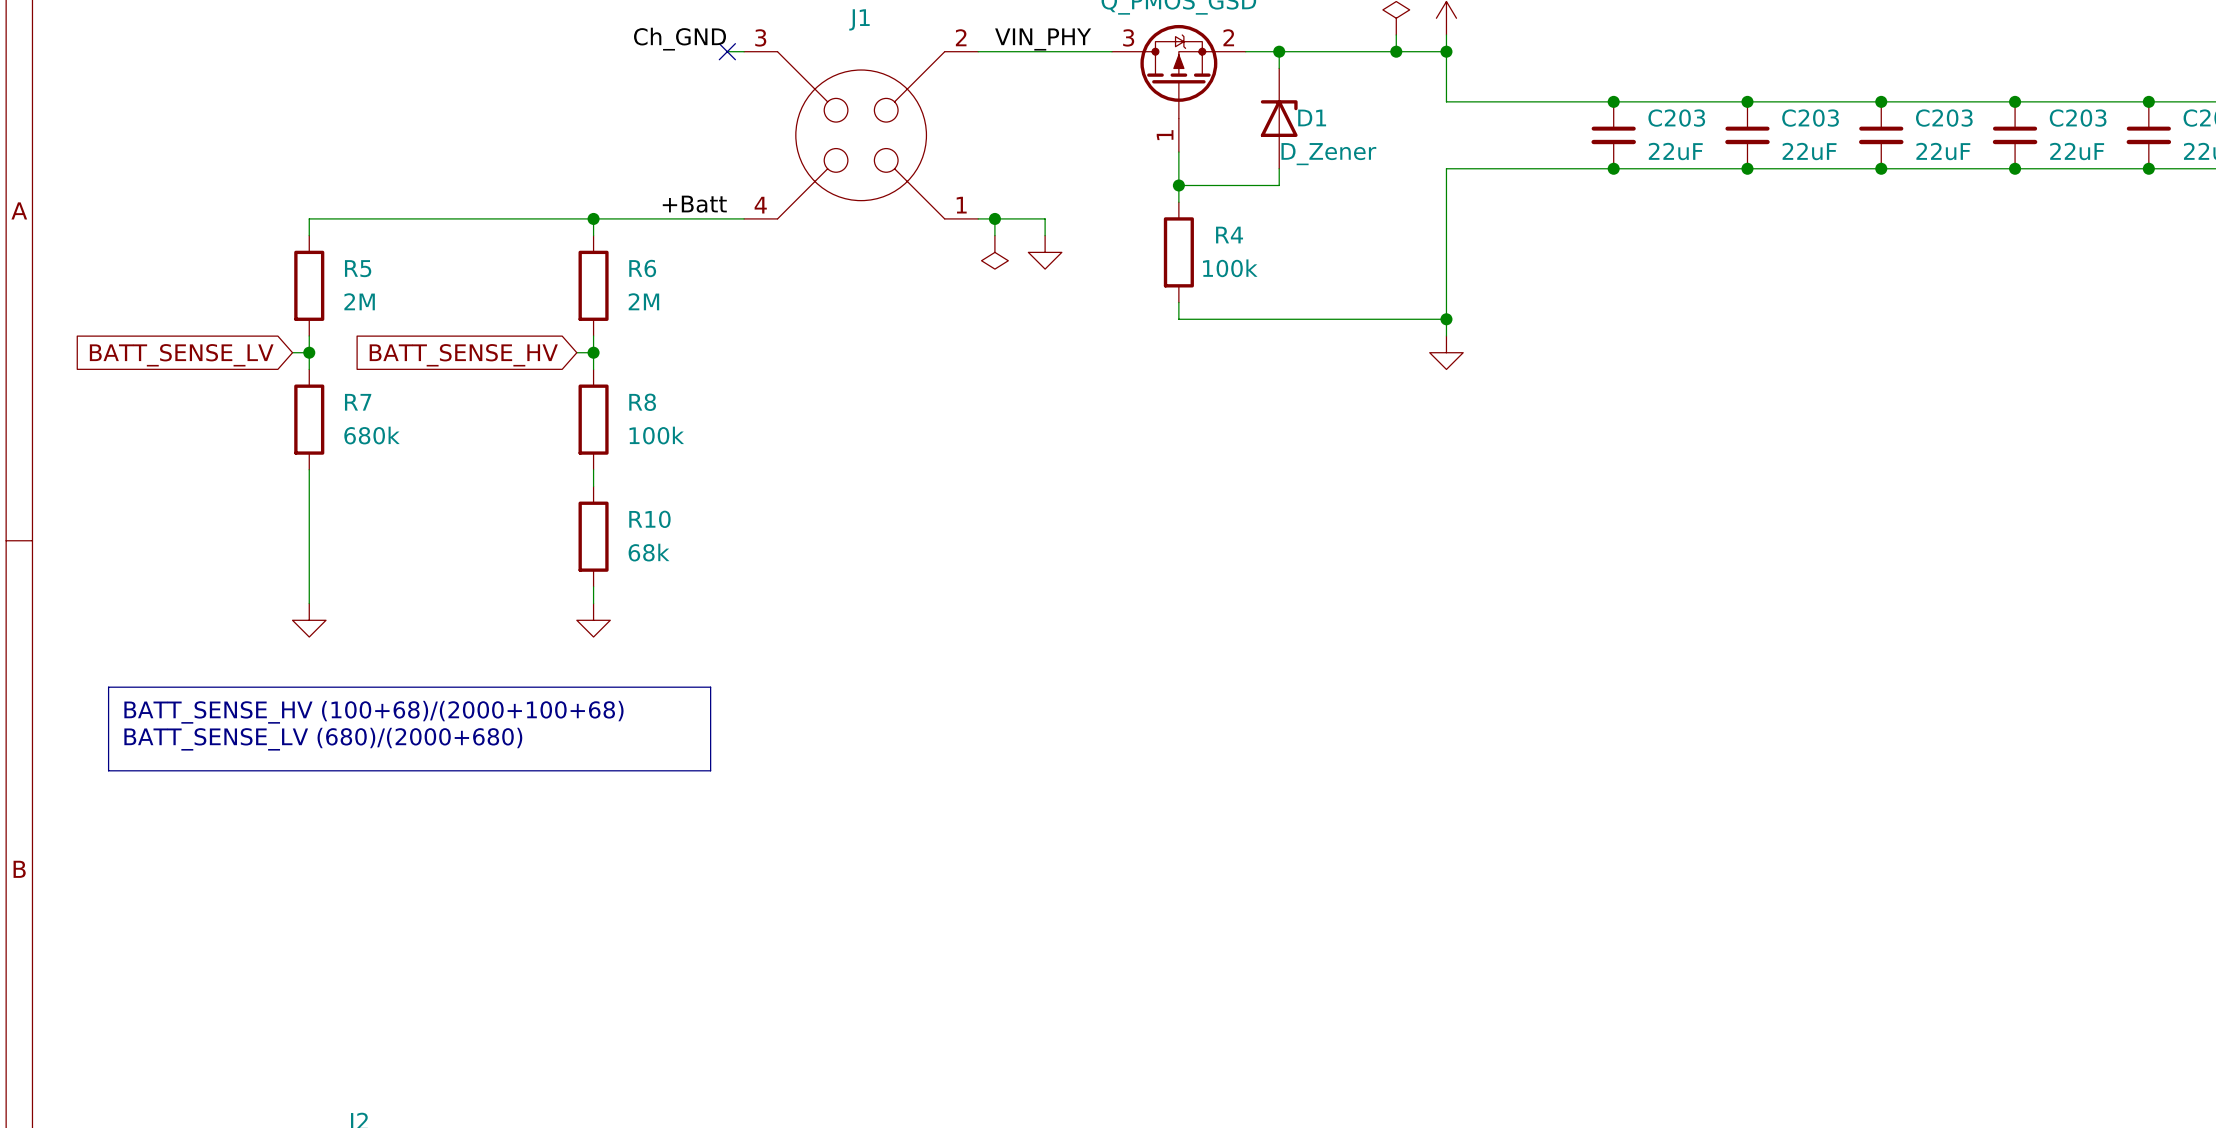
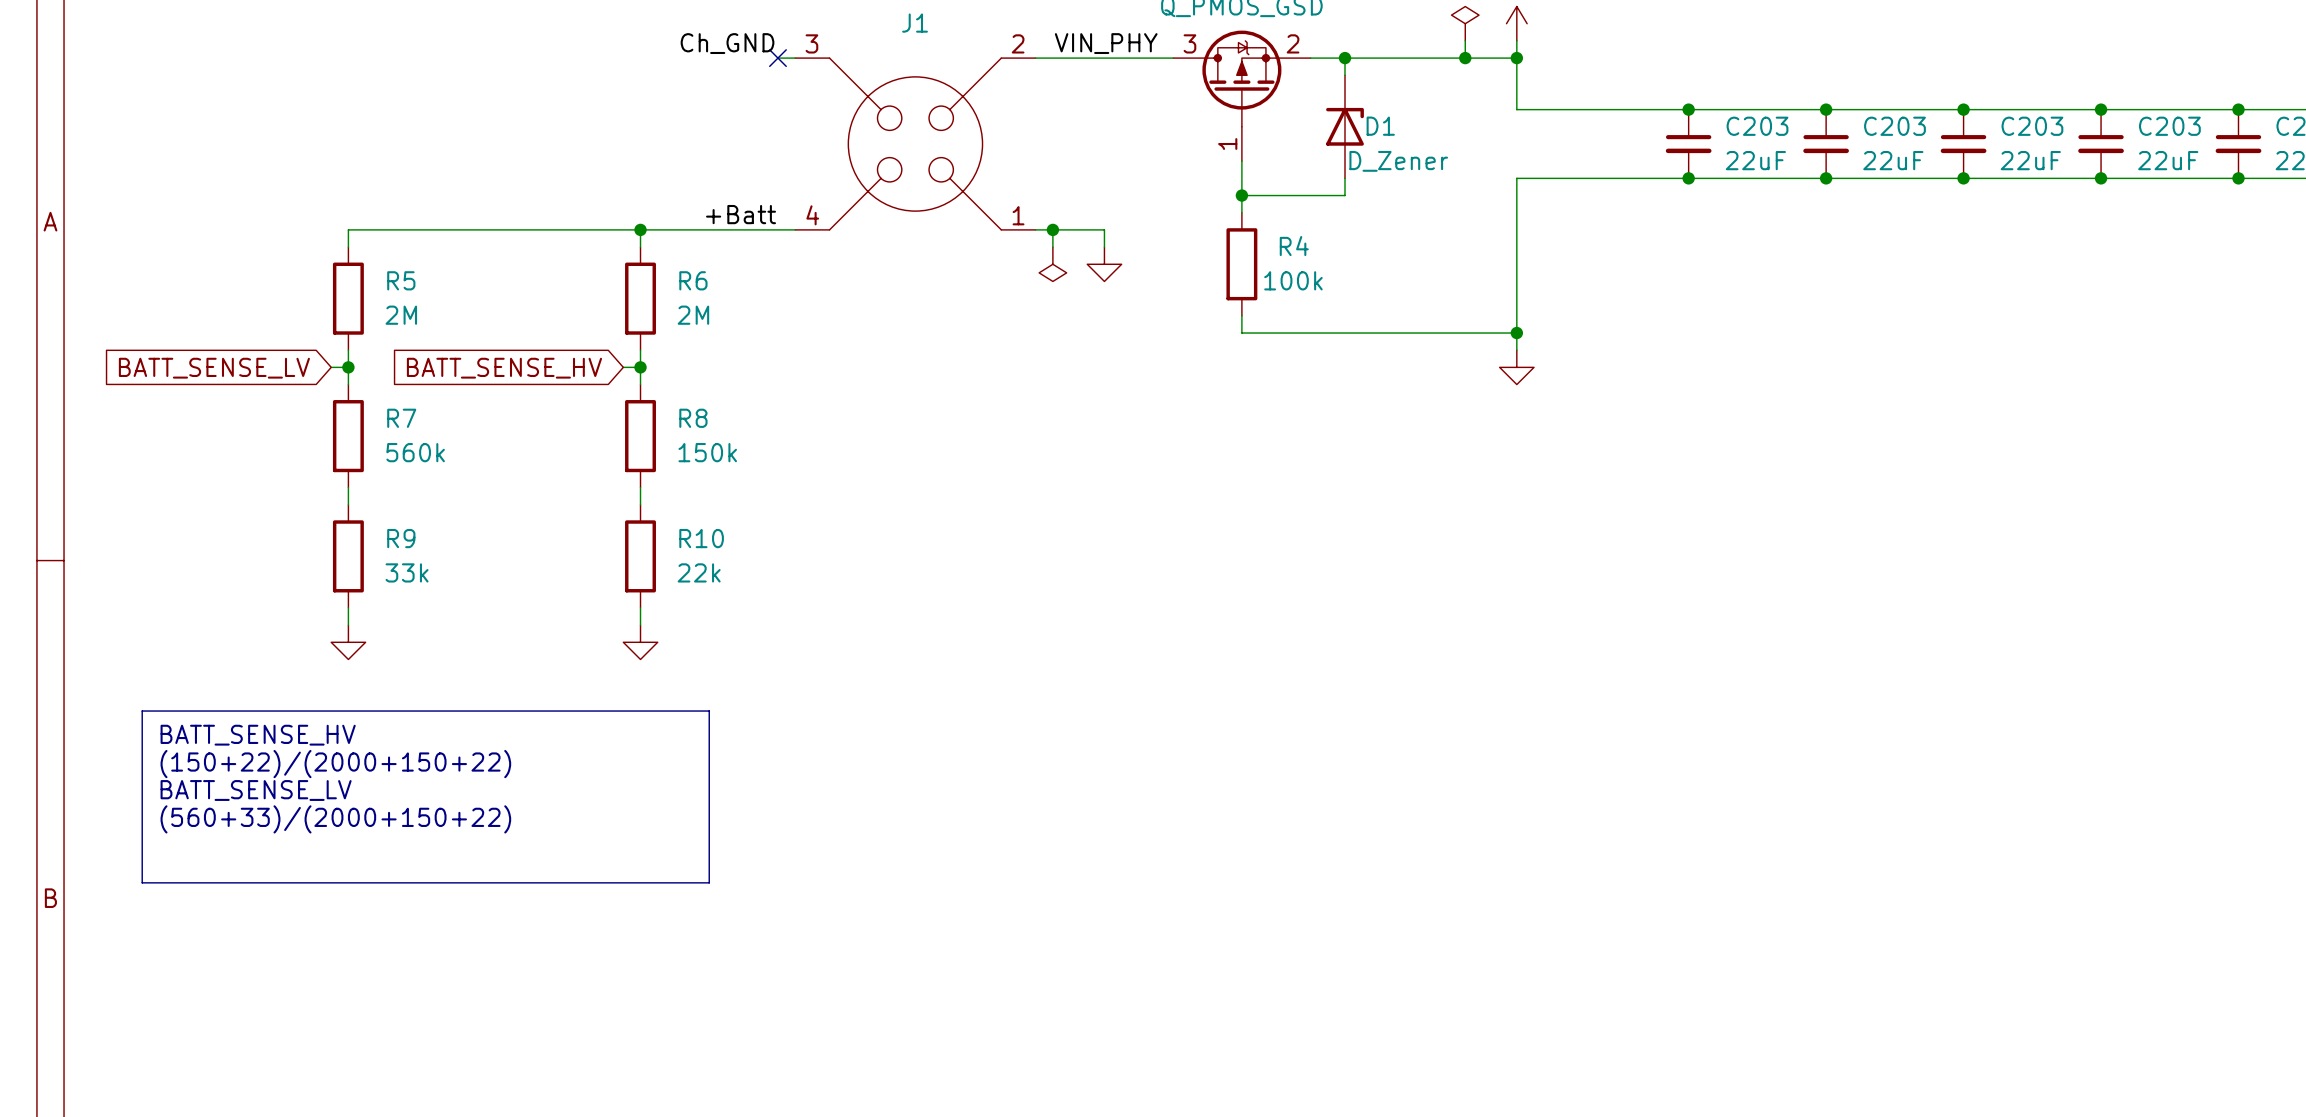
R7 value: 680k (372, 435) -> 560k (415, 452)
R8 value: 100k (656, 435) -> 150k (707, 452)
wire: (309, 486) (309, 586) -> none
R9: none -> 33k (348, 556)
R10 value: 68k (649, 552) -> 22k (699, 572)
line: (660, 687) (710, 687) (710, 770) (108, 770) -> (709, 711) (709, 882) (142, 882) (142, 796)
text: BATT_SENSE_HV (100+68)/(2000+100+68) (373, 712) -> BATT_SENSE_HV (258, 735)
text: BATT_SENSE_LV (680)/(2000+680) (323, 739) -> (150+22)/(2000+150+22) (335, 764)
text: none -> BATT_SENSE_LV (256, 790)
text: none -> (560+33)/(2000+150+22) (335, 819)

